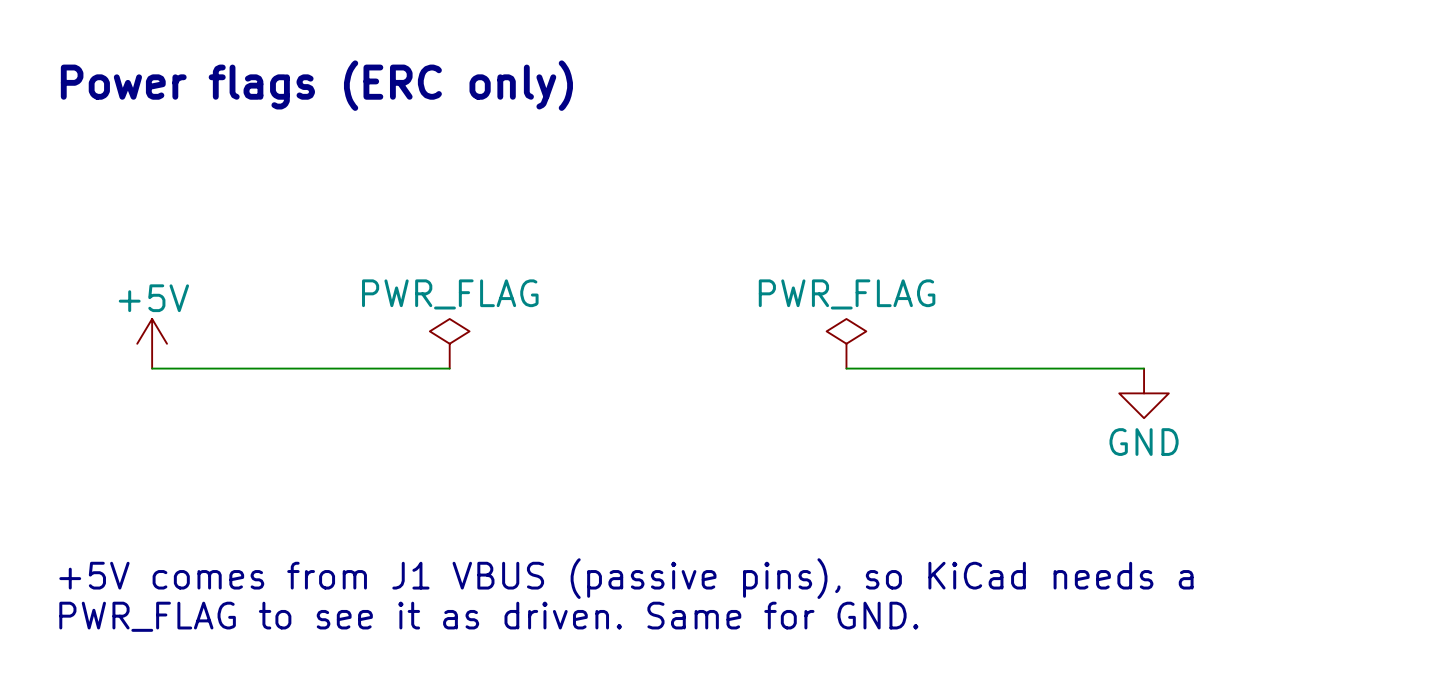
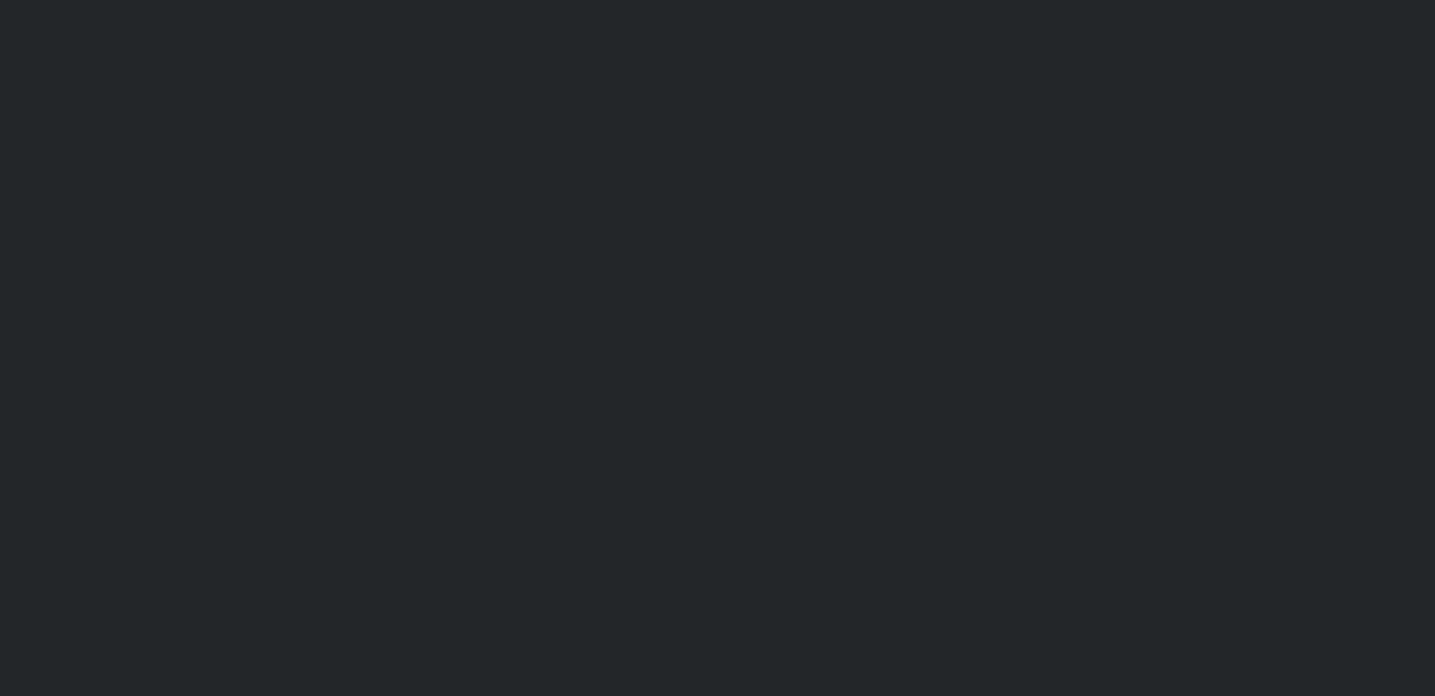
text: Power flags (ERC only) (316, 85) -> none
power symbol: +5V (152, 343) -> none
power symbol: PWR_FLAG (449, 343) -> none
power symbol: PWR_FLAG (846, 343) -> none
wire: (152, 368) (449, 368) -> none
wire: (846, 368) (1144, 368) -> none
power symbol: GND (1144, 393) -> none
text: +5V comes from J1 VBUS (passive pins), so KiCad needs a (626, 578) -> none
text: PWR_FLAG to see it as driven. Same for GND. (488, 616) -> none

